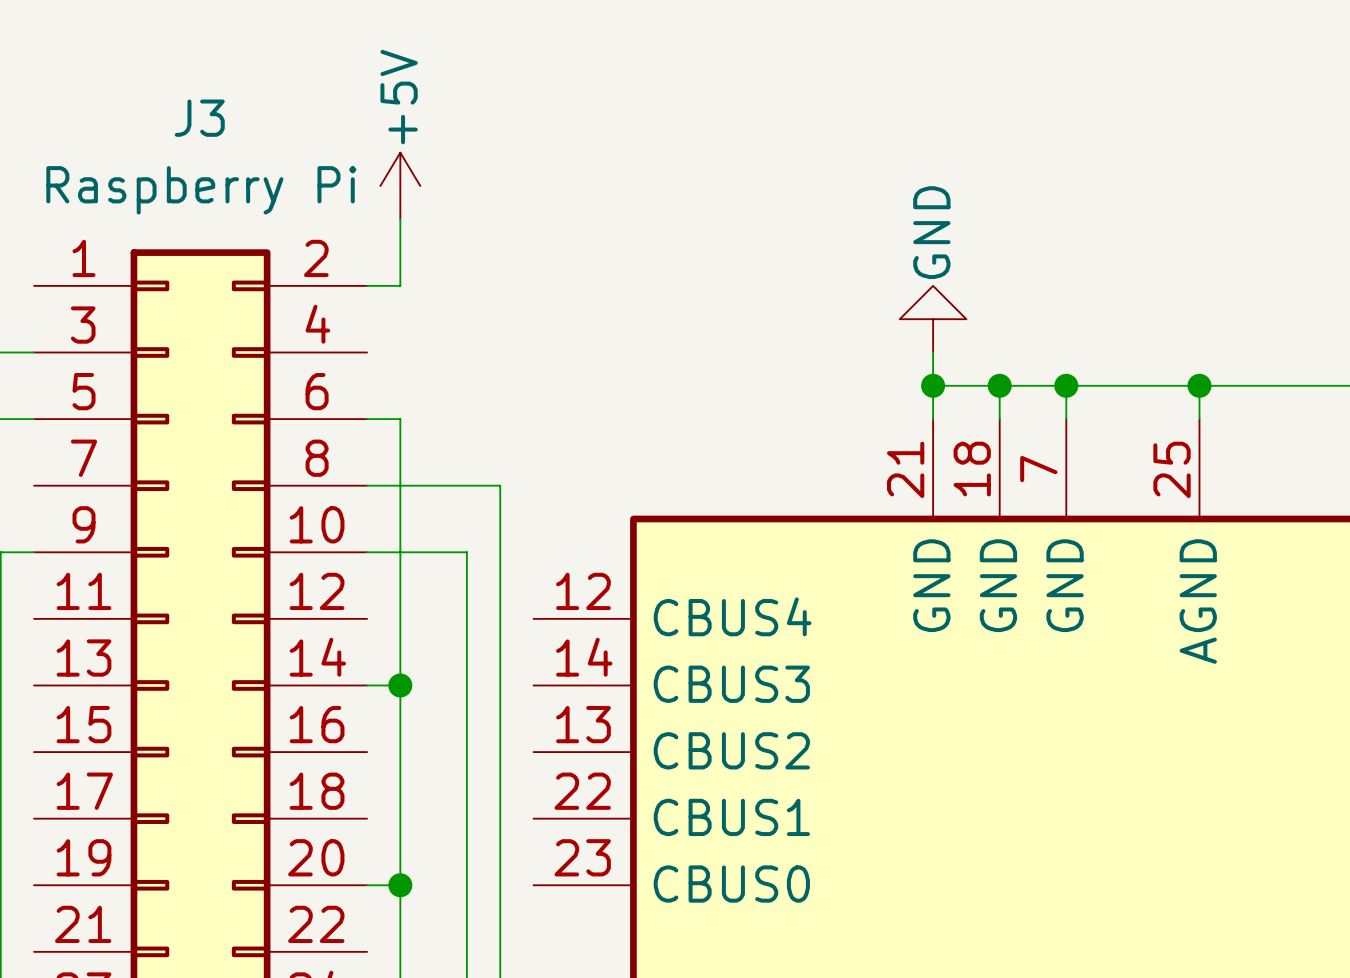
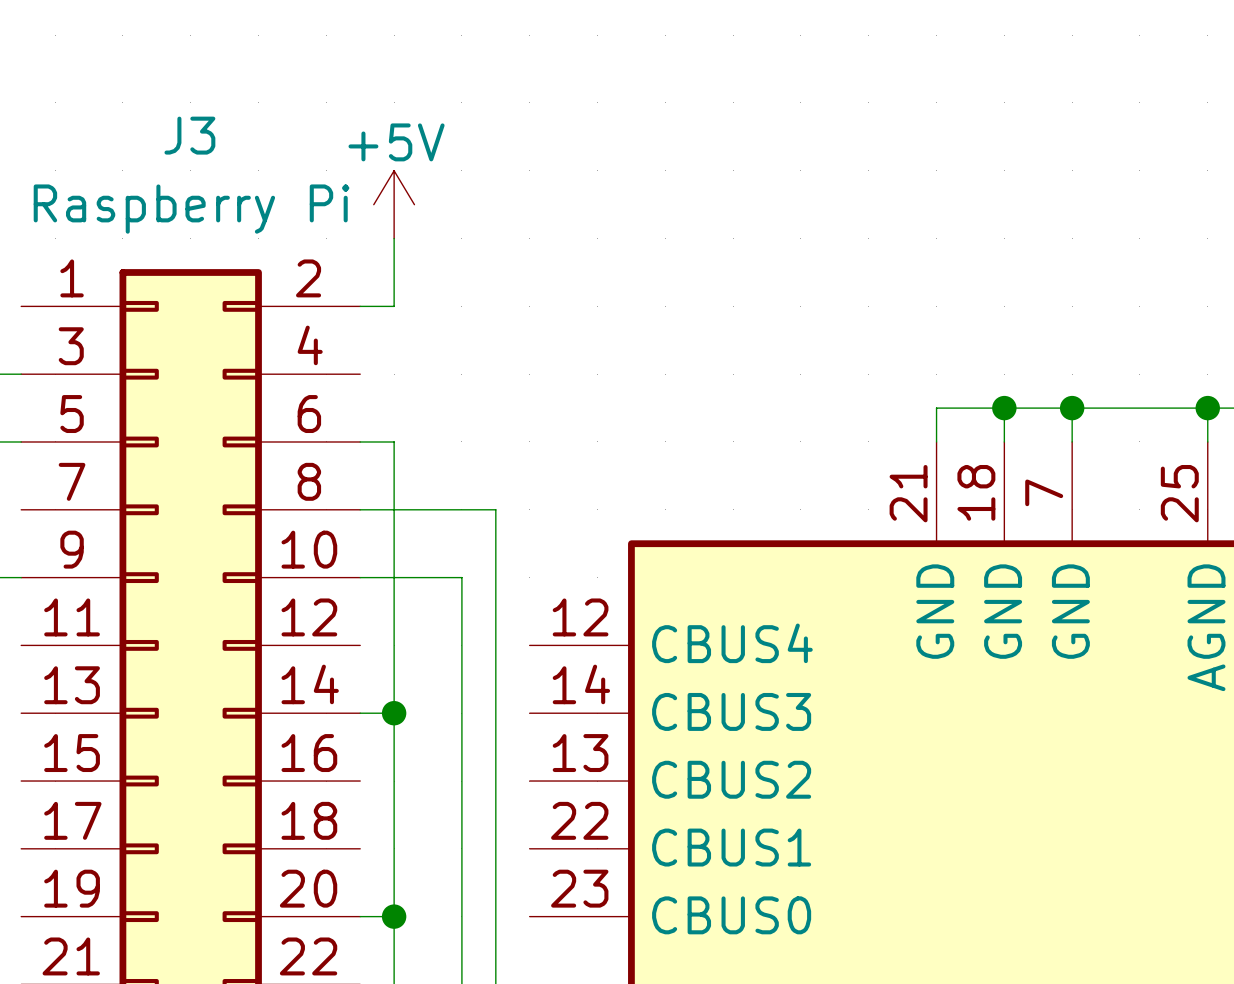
power symbol text rotation: 0° (399, 97) -> 90° clockwise (396, 142)
power symbol: GND (933, 319) -> none
wire: (933, 352) (933, 385) -> none
junction: (933, 385) -> none

